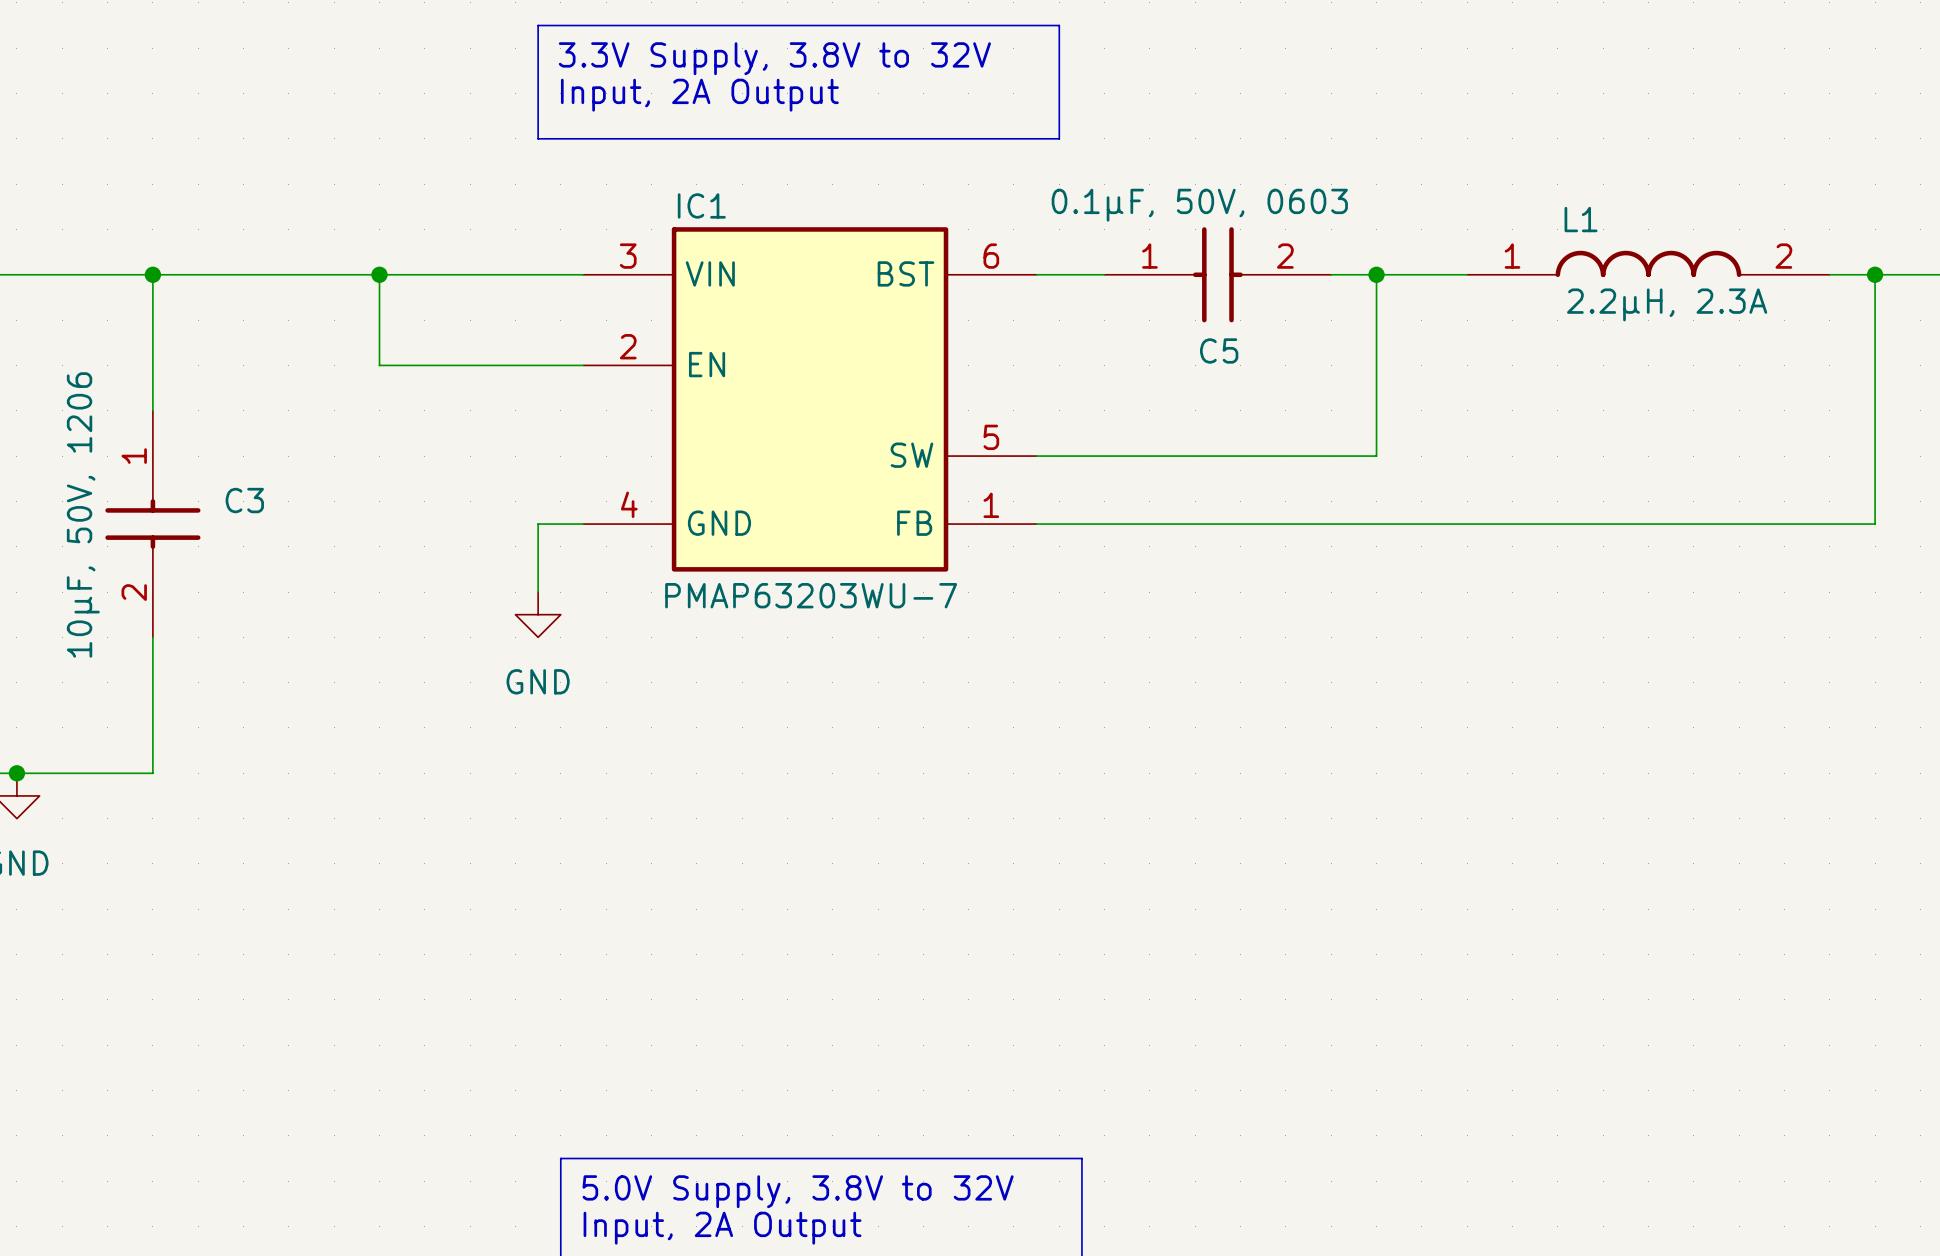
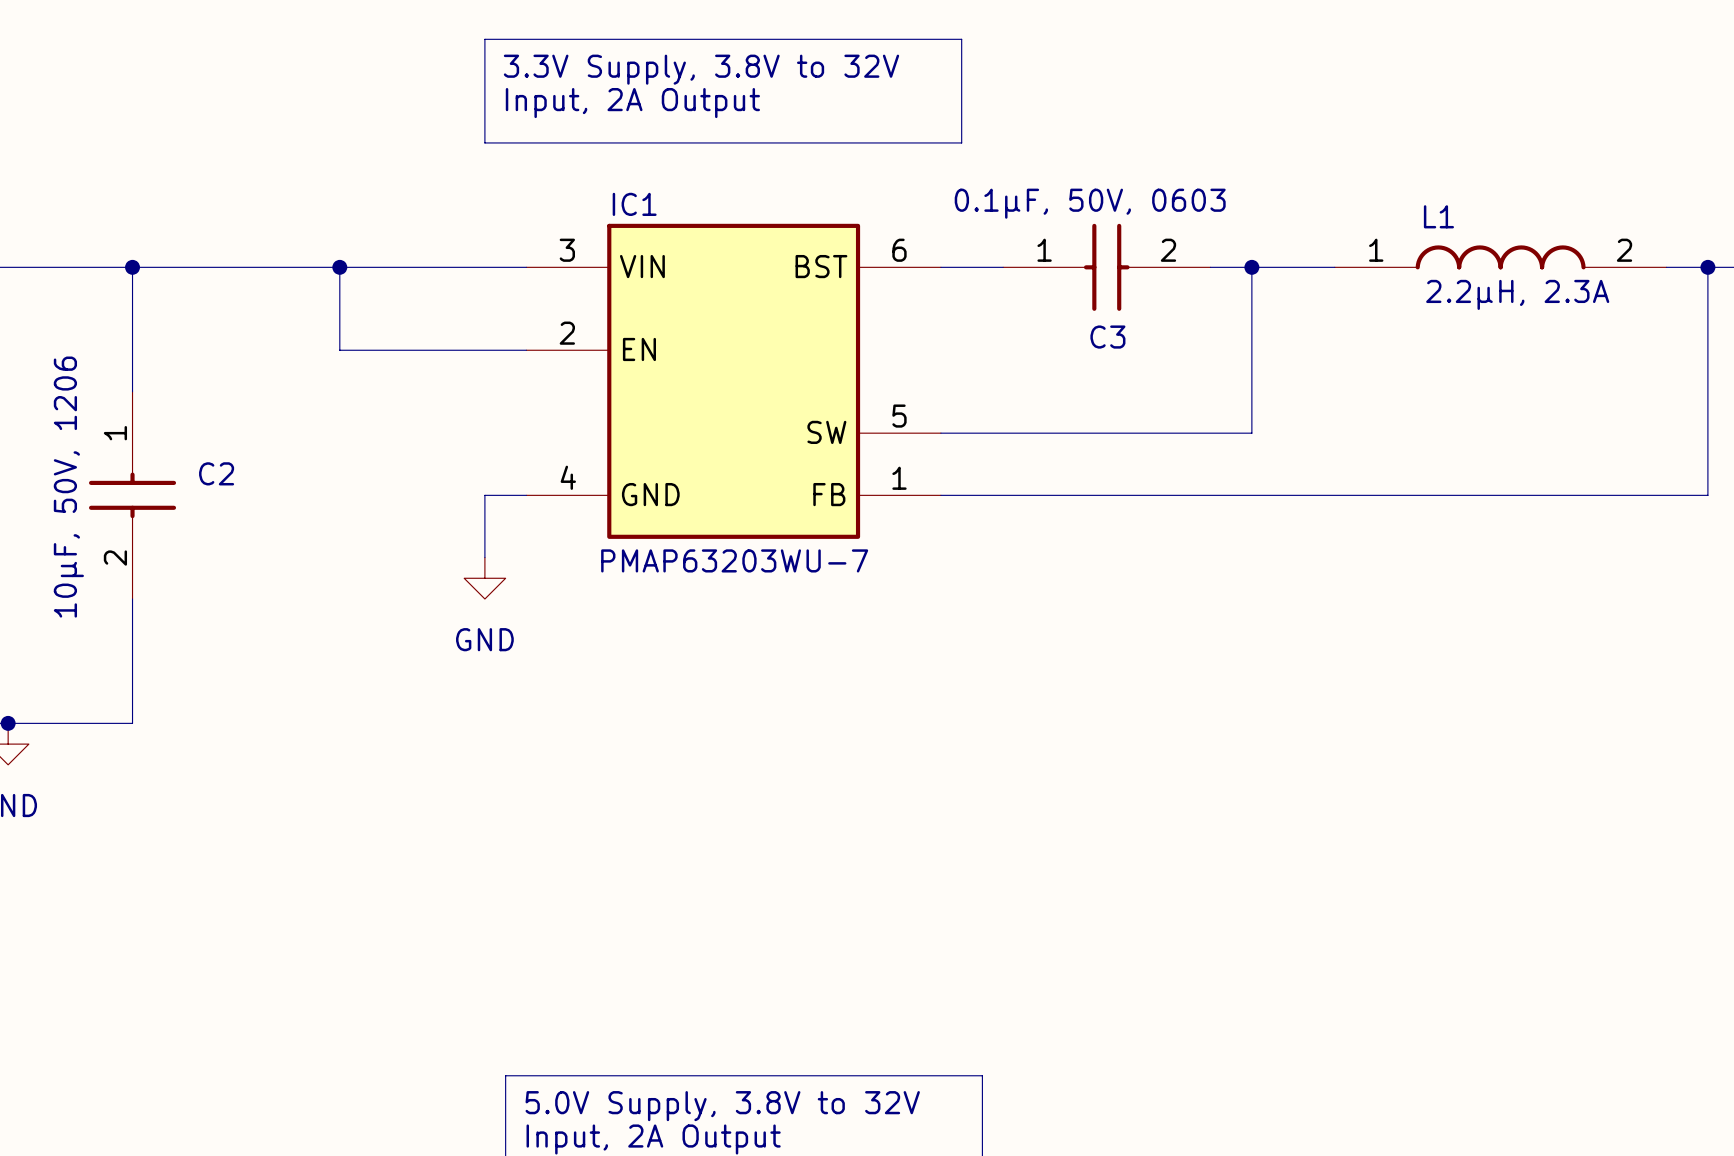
C5 name: C5 (1219, 350) -> C3 (1107, 337)
C3 name: C3 (244, 500) -> C2 (216, 473)

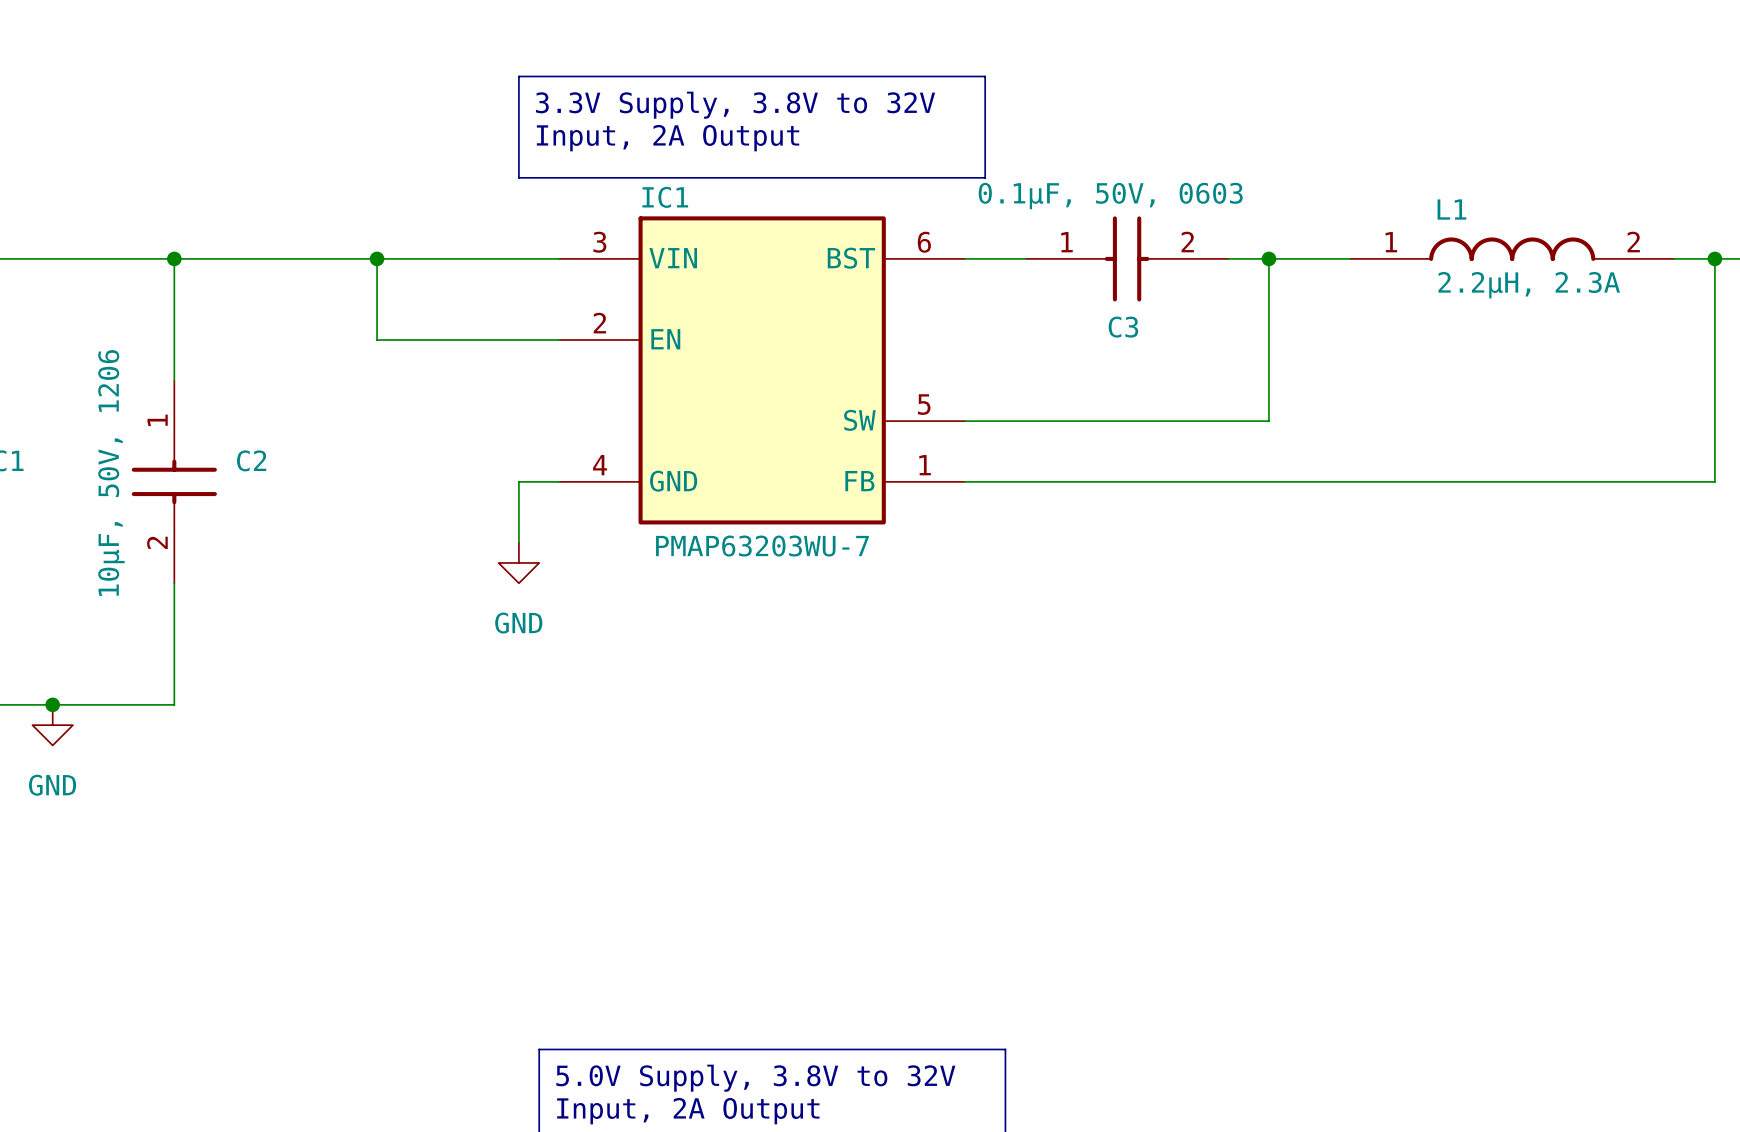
text: 3.3V Supply, 3.8V to 32V (701, 69) -> none
line: (484, 80) (484, 39) (961, 39) (961, 80) -> (518, 76) (985, 76)
text: Input, 2A Output (632, 103) -> 3.3V Supply, 3.8V to 32V (735, 105)
line: (484, 142) (961, 142) -> (518, 137) (518, 177) (985, 177) (985, 137)
text: none -> Input, 2A Output (668, 138)

